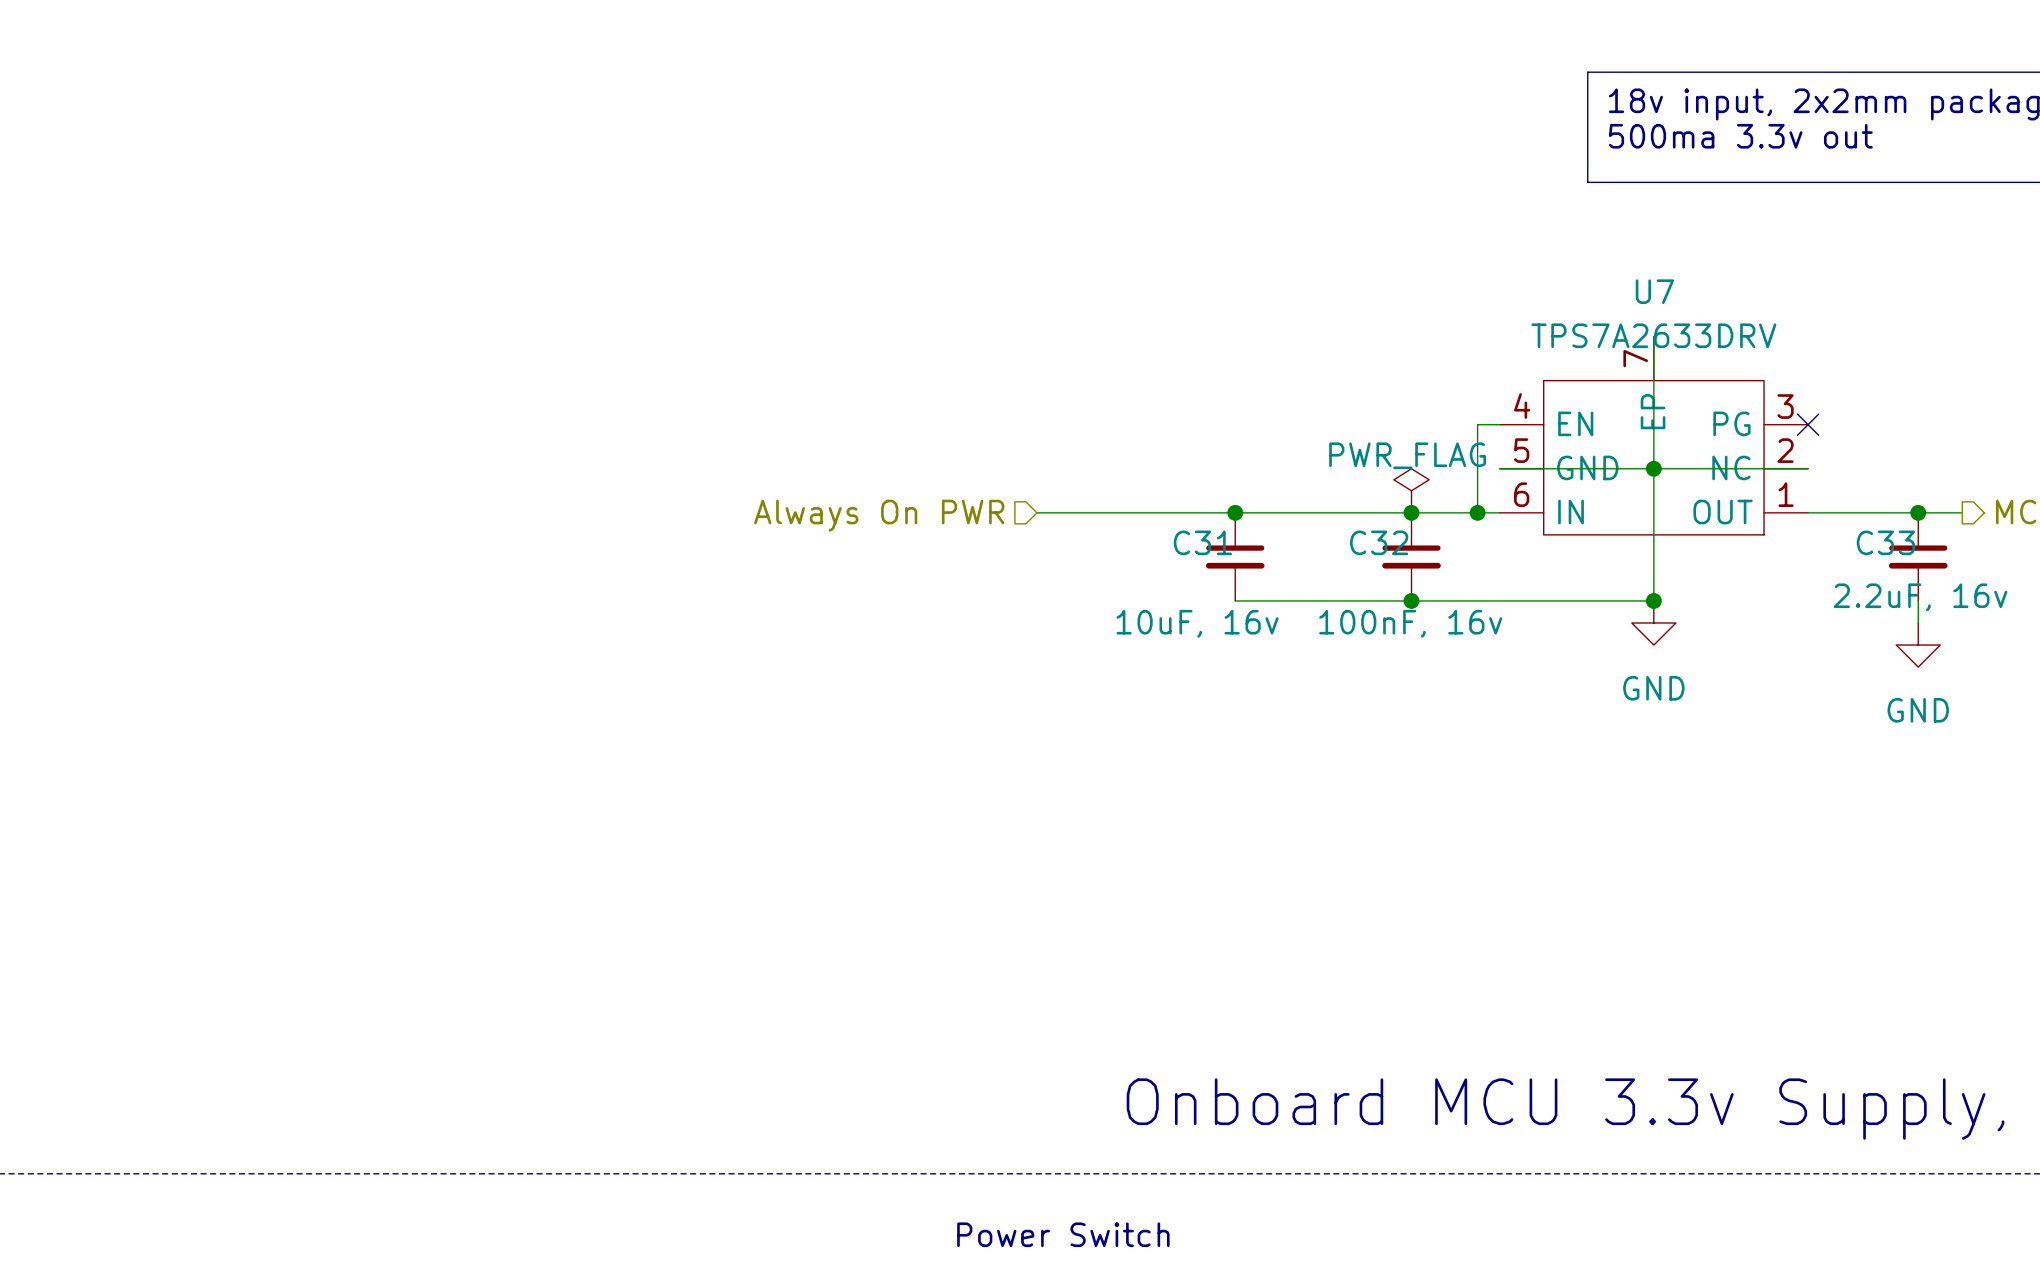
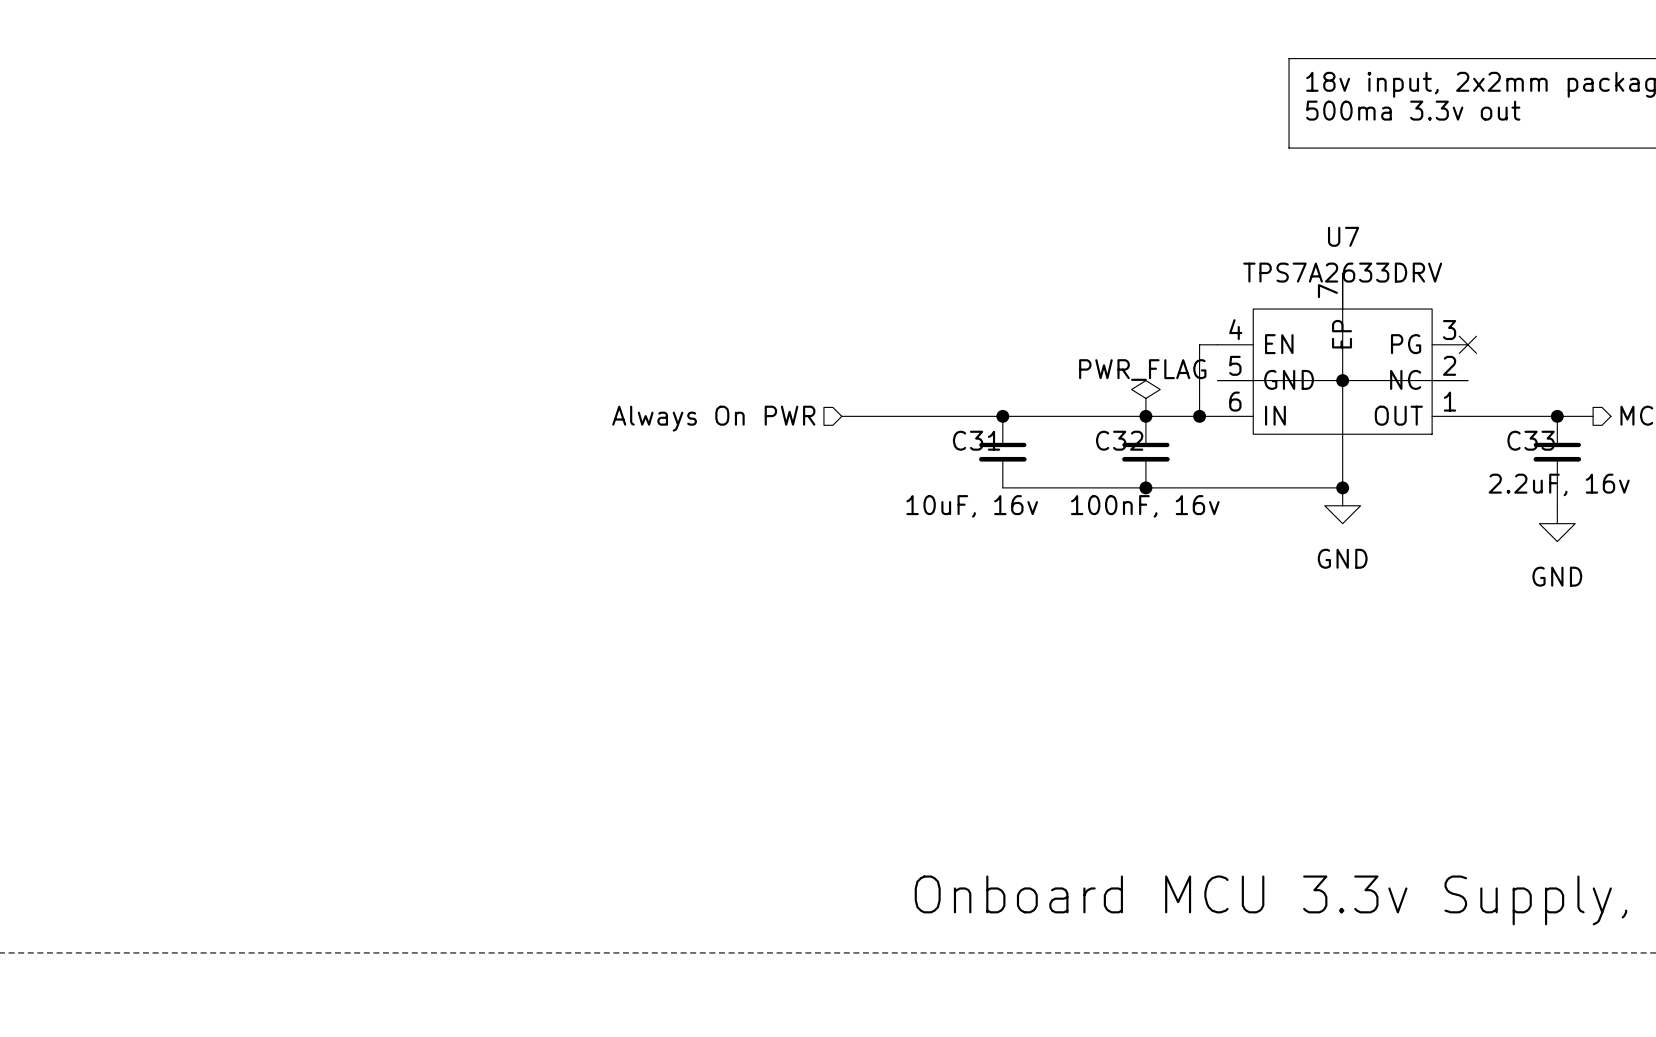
text: Power Switch (1063, 1234) -> none

